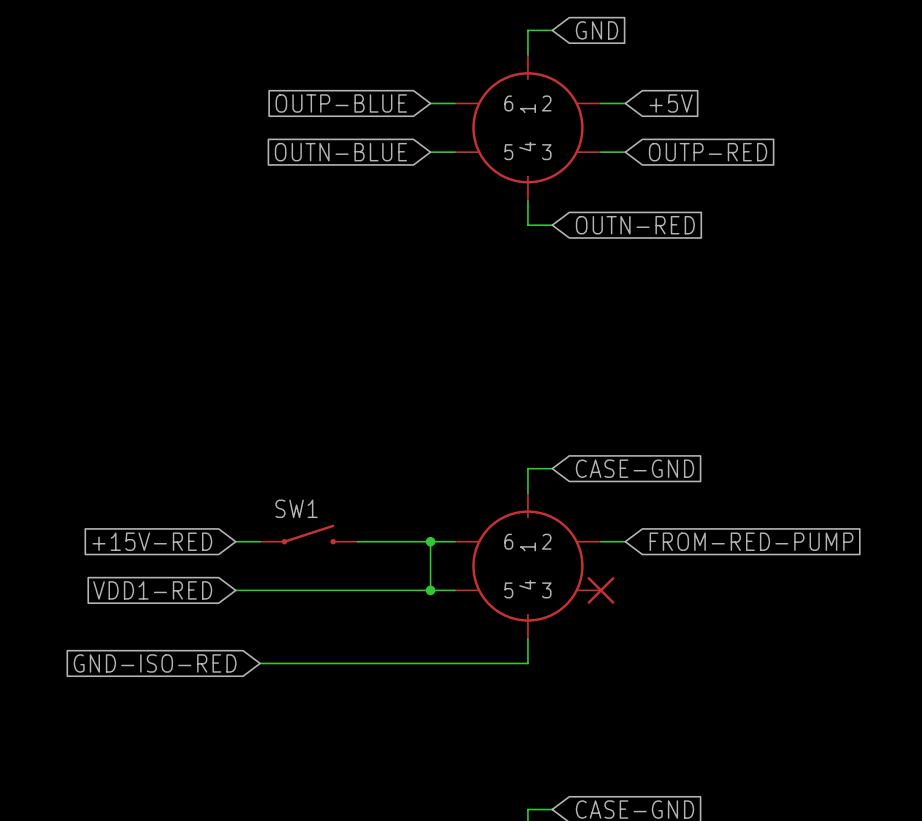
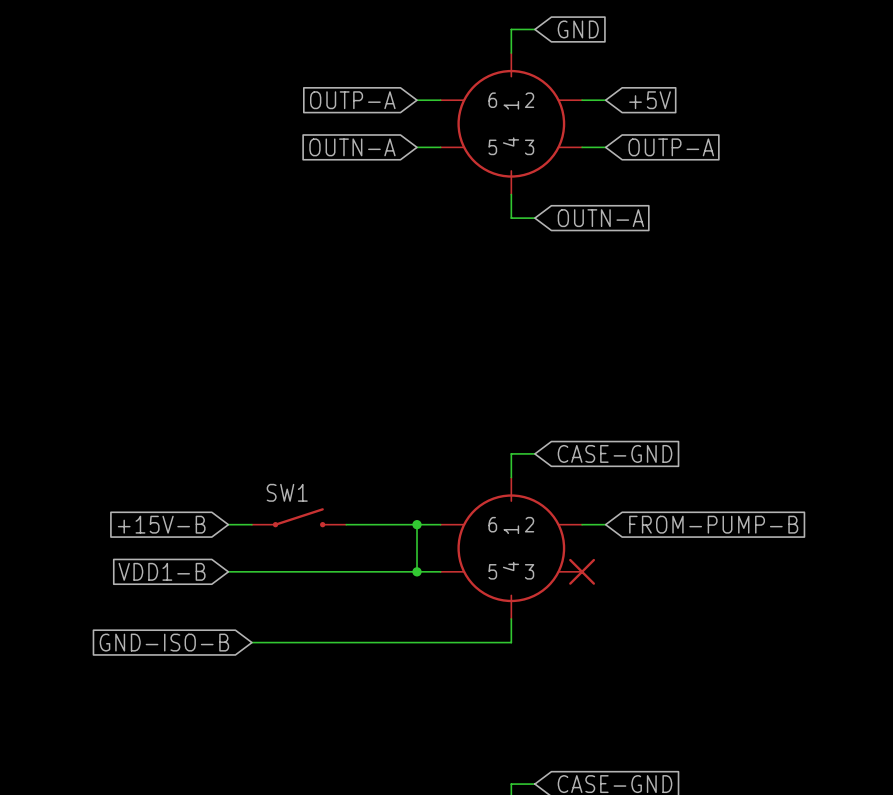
global label: OUTP-BLUE (341, 103) -> OUTP-A (352, 100)
global label: OUTN-BLUE (340, 152) -> OUTN-A (352, 147)
global label: OUTP-RED (708, 152) -> OUTP-A (671, 147)
global label: OUTN-RED (635, 225) -> OUTN-A (600, 218)
global label: +15V-RED (152, 541) -> +15V-B (161, 524)
global label: FROM-RED-PUMP (751, 541) -> FROM-PUMP-B (713, 524)
global label: VDD1-RED (152, 590) -> VDD1-B (162, 571)
global label: GND-ISO-RED (155, 663) -> GND-ISO-B (164, 642)

